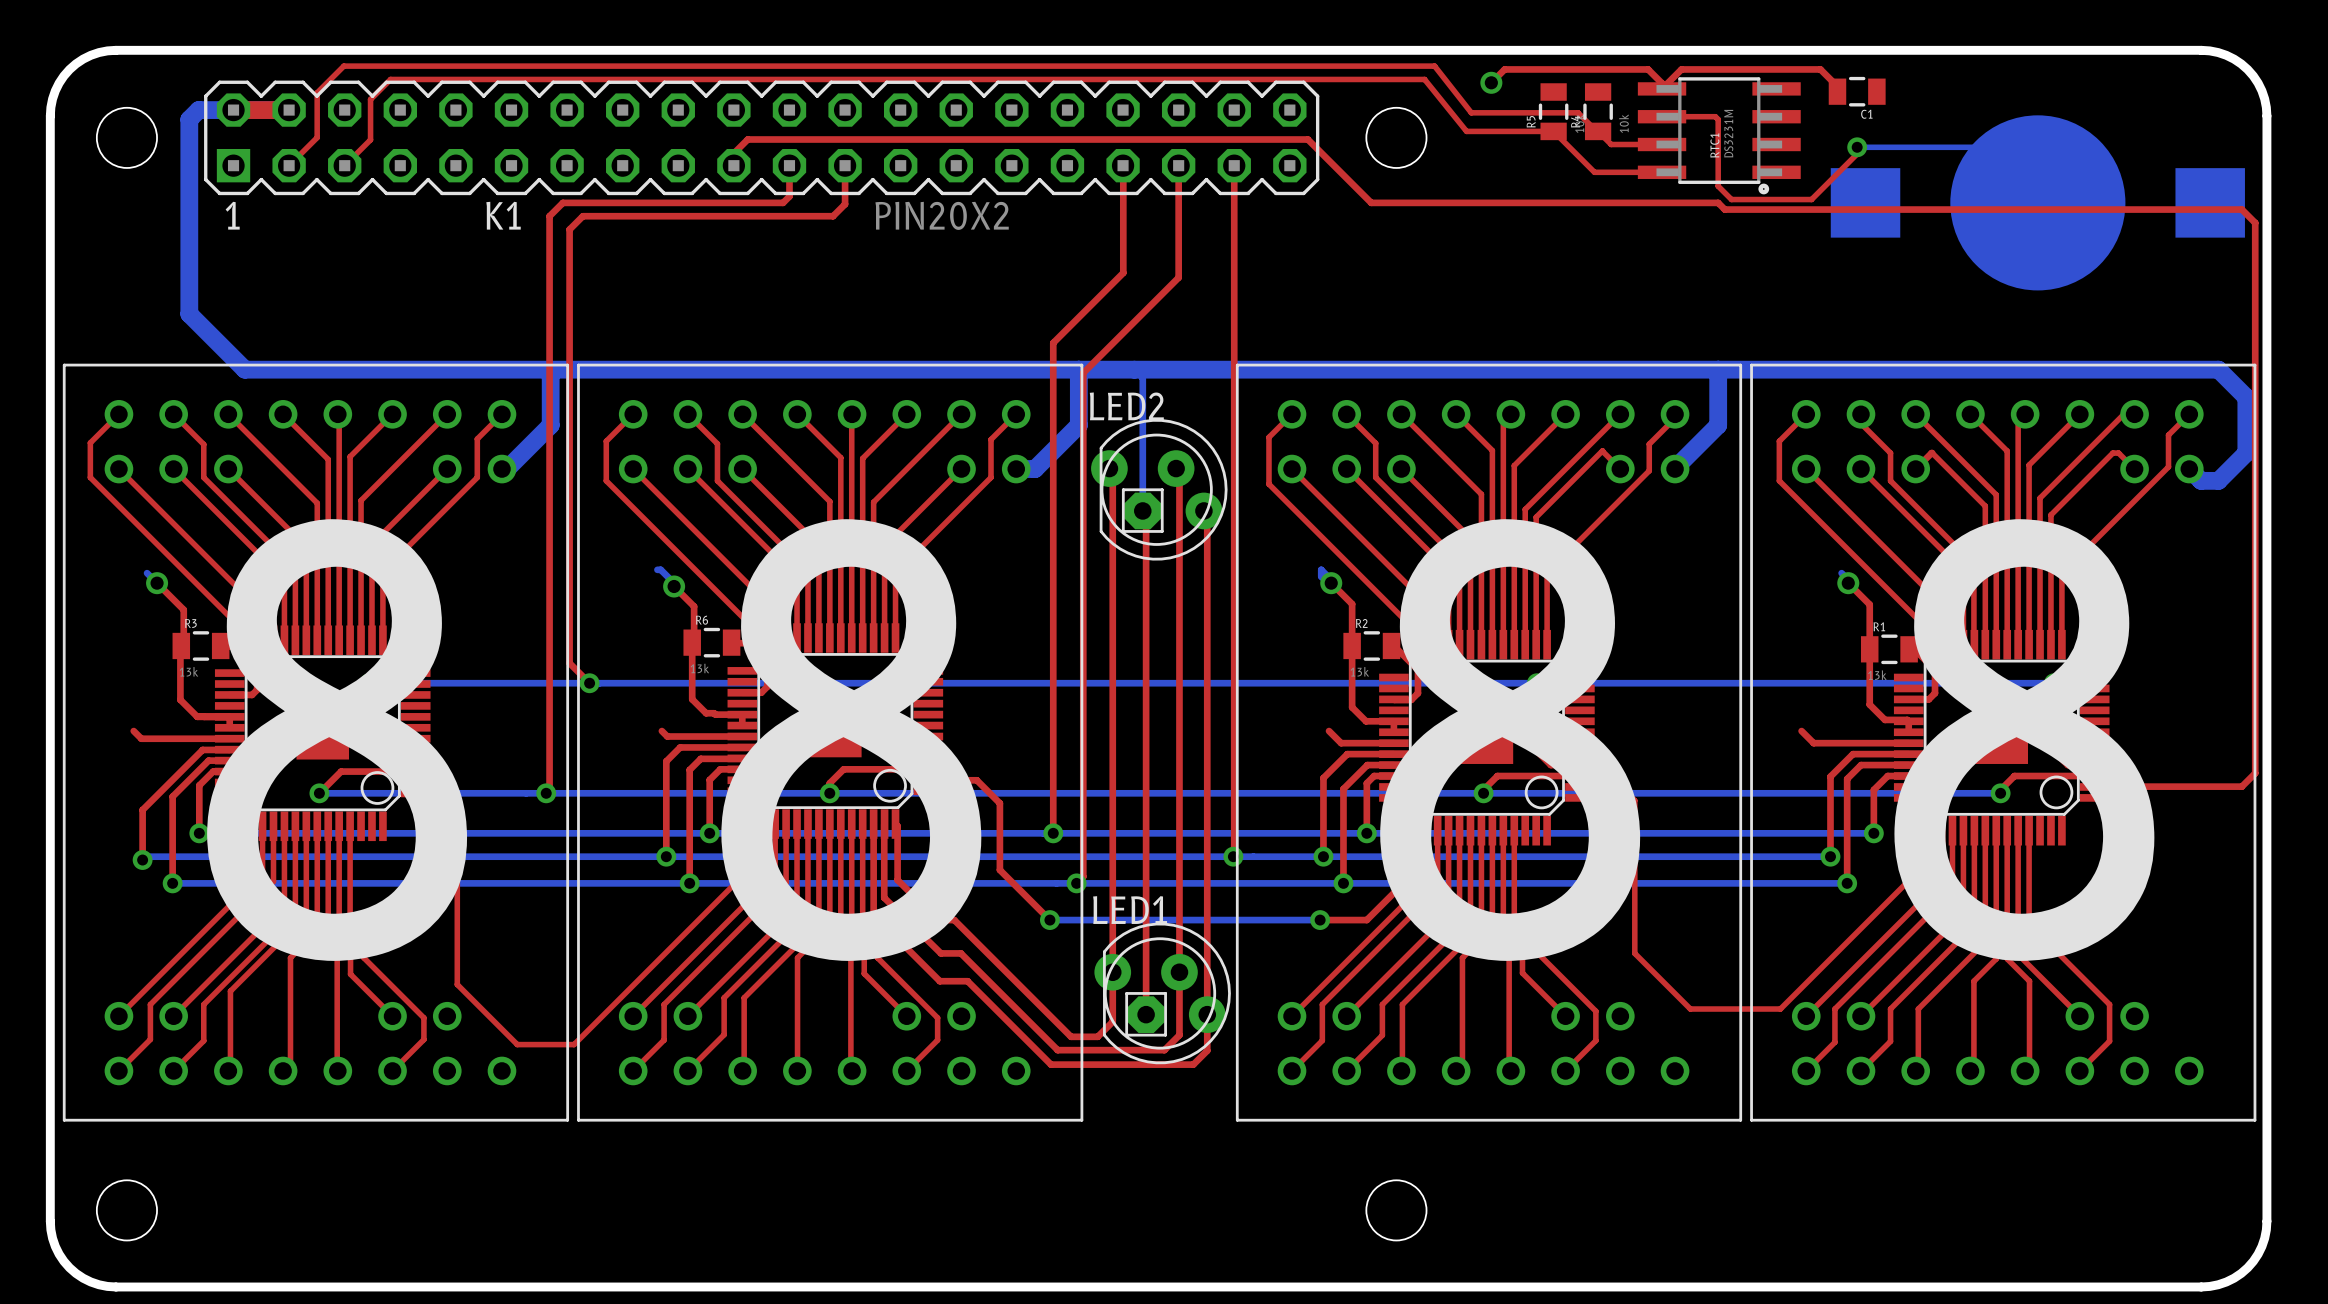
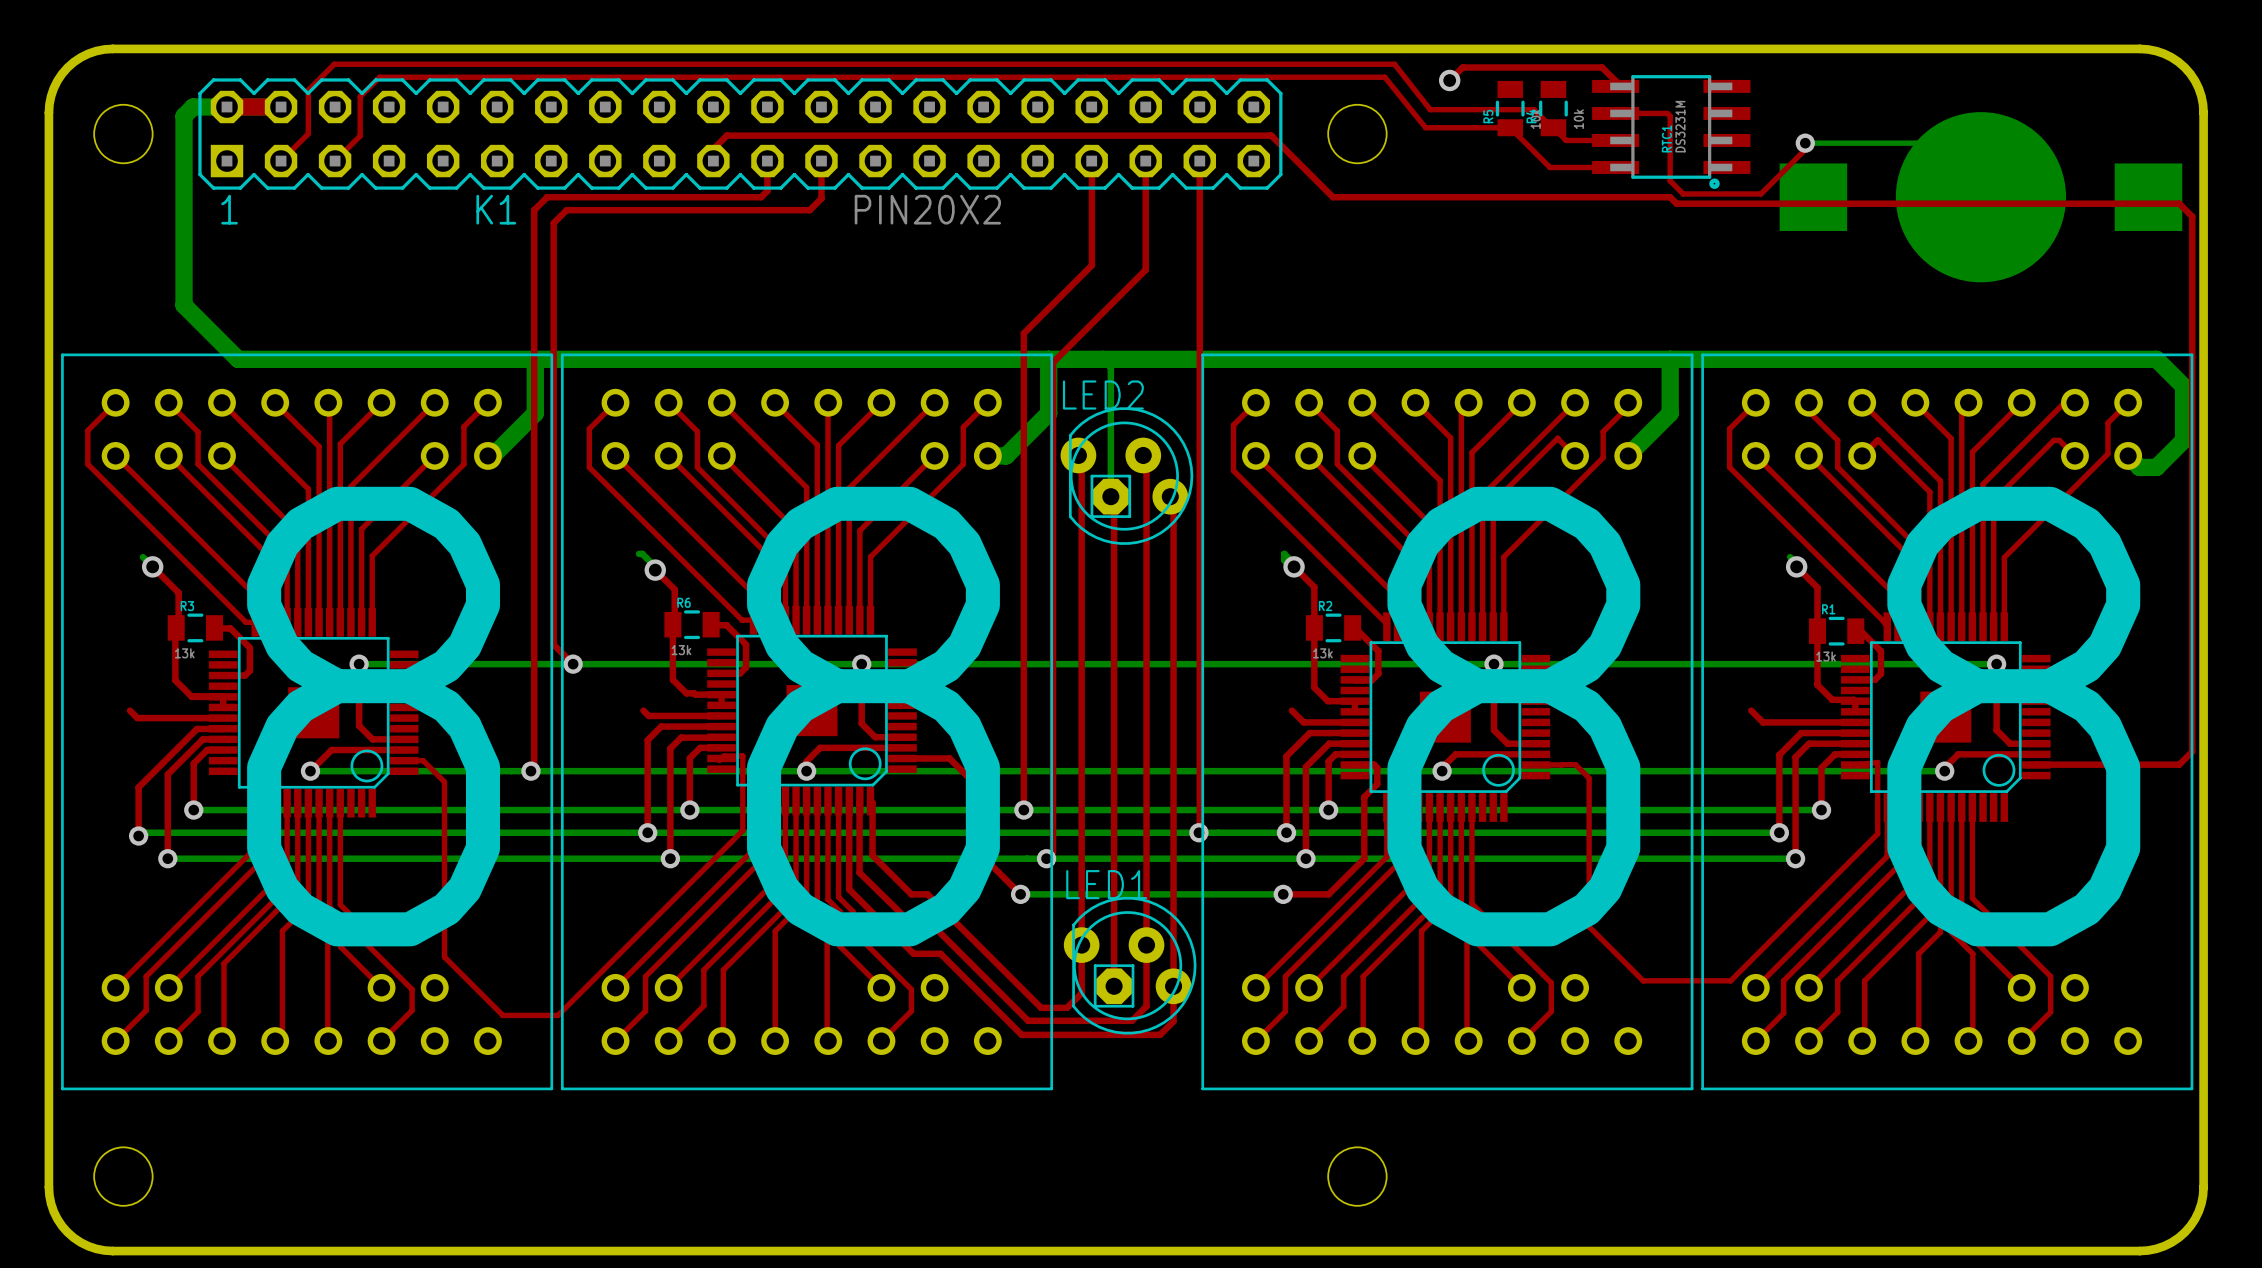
top track: (1662, 88) (1681, 69) (1820, 69) (1837, 86) (1837, 91) -> none
C1: (1857, 91) -> none

